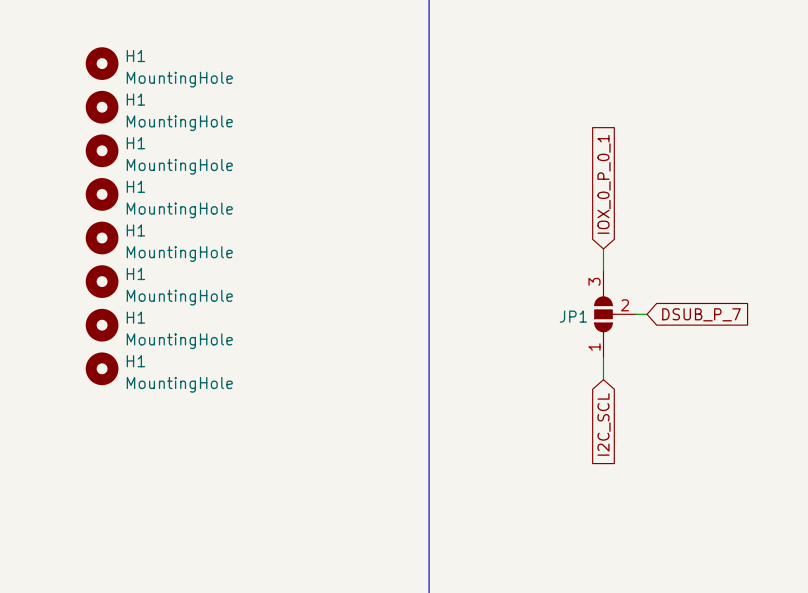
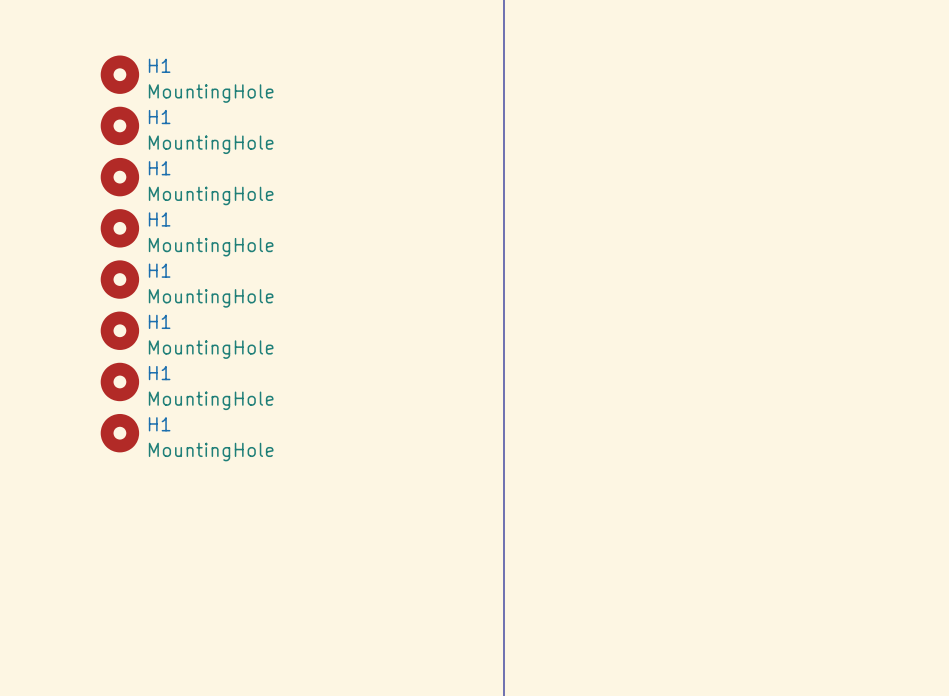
global label: IOX_0_P_0_1 (604, 184) -> none
wire: (603, 248) (603, 270) -> none
JP1: (615, 314) -> none
wire: (636, 314) (647, 314) -> none
global label: DSUB_P_7 (701, 314) -> none
wire: (603, 357) (603, 379) -> none
global label: I2C_SCL (604, 424) -> none

